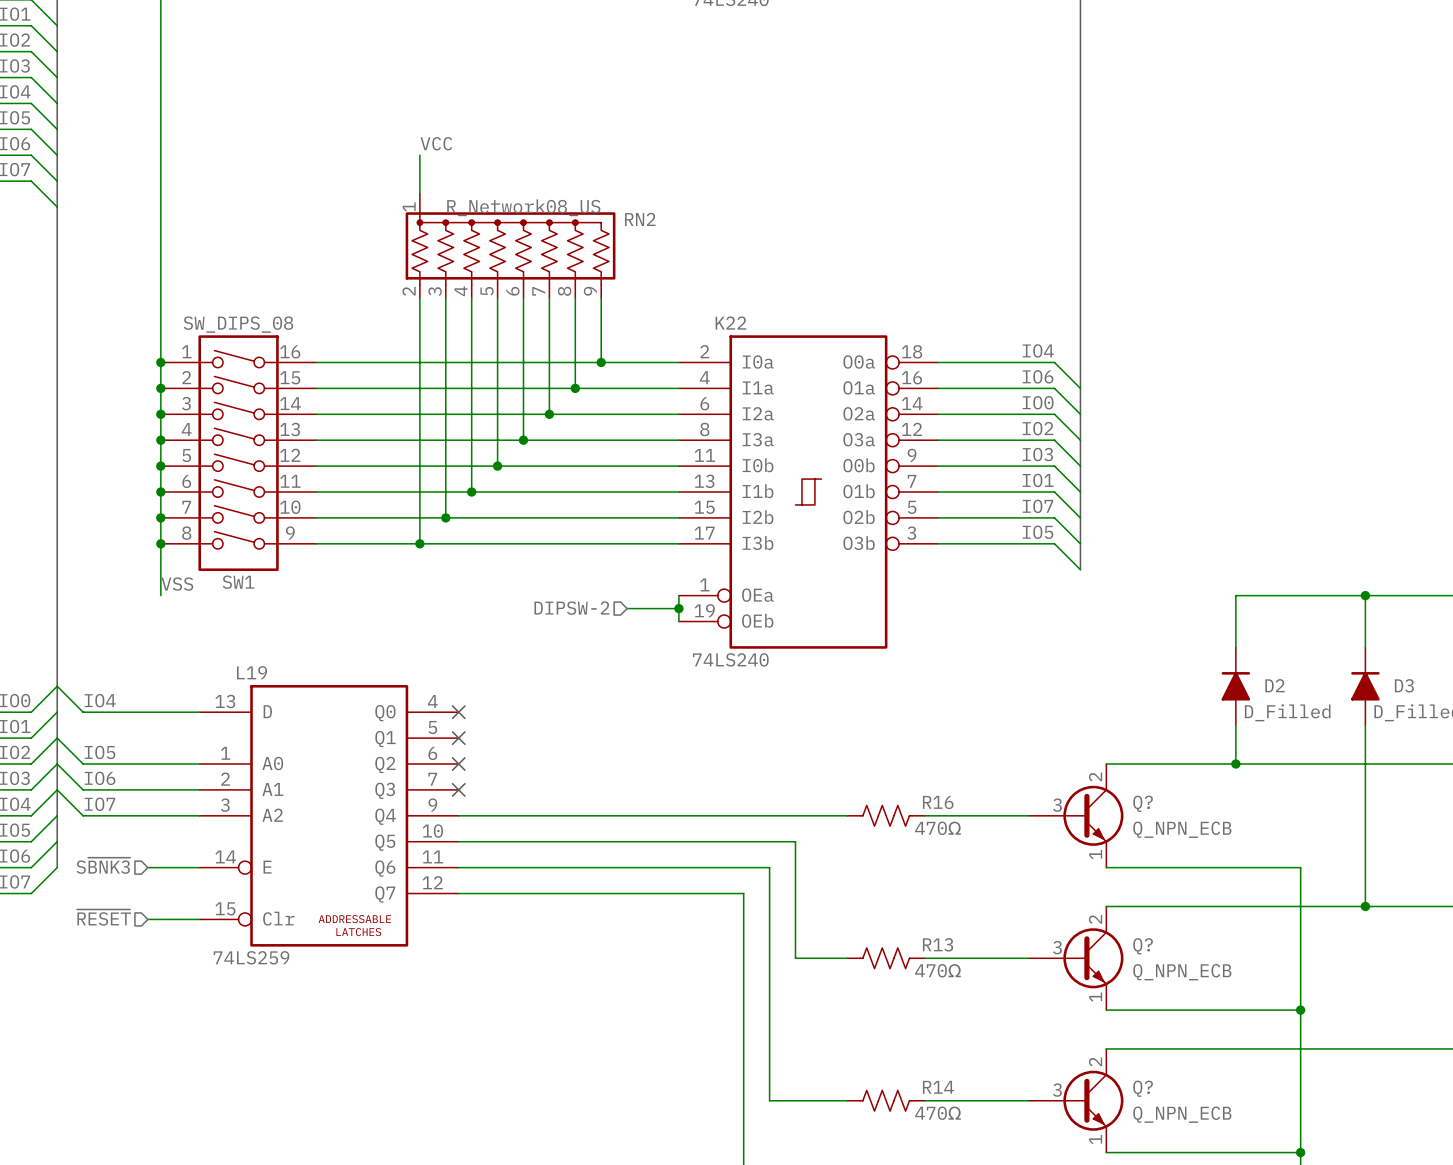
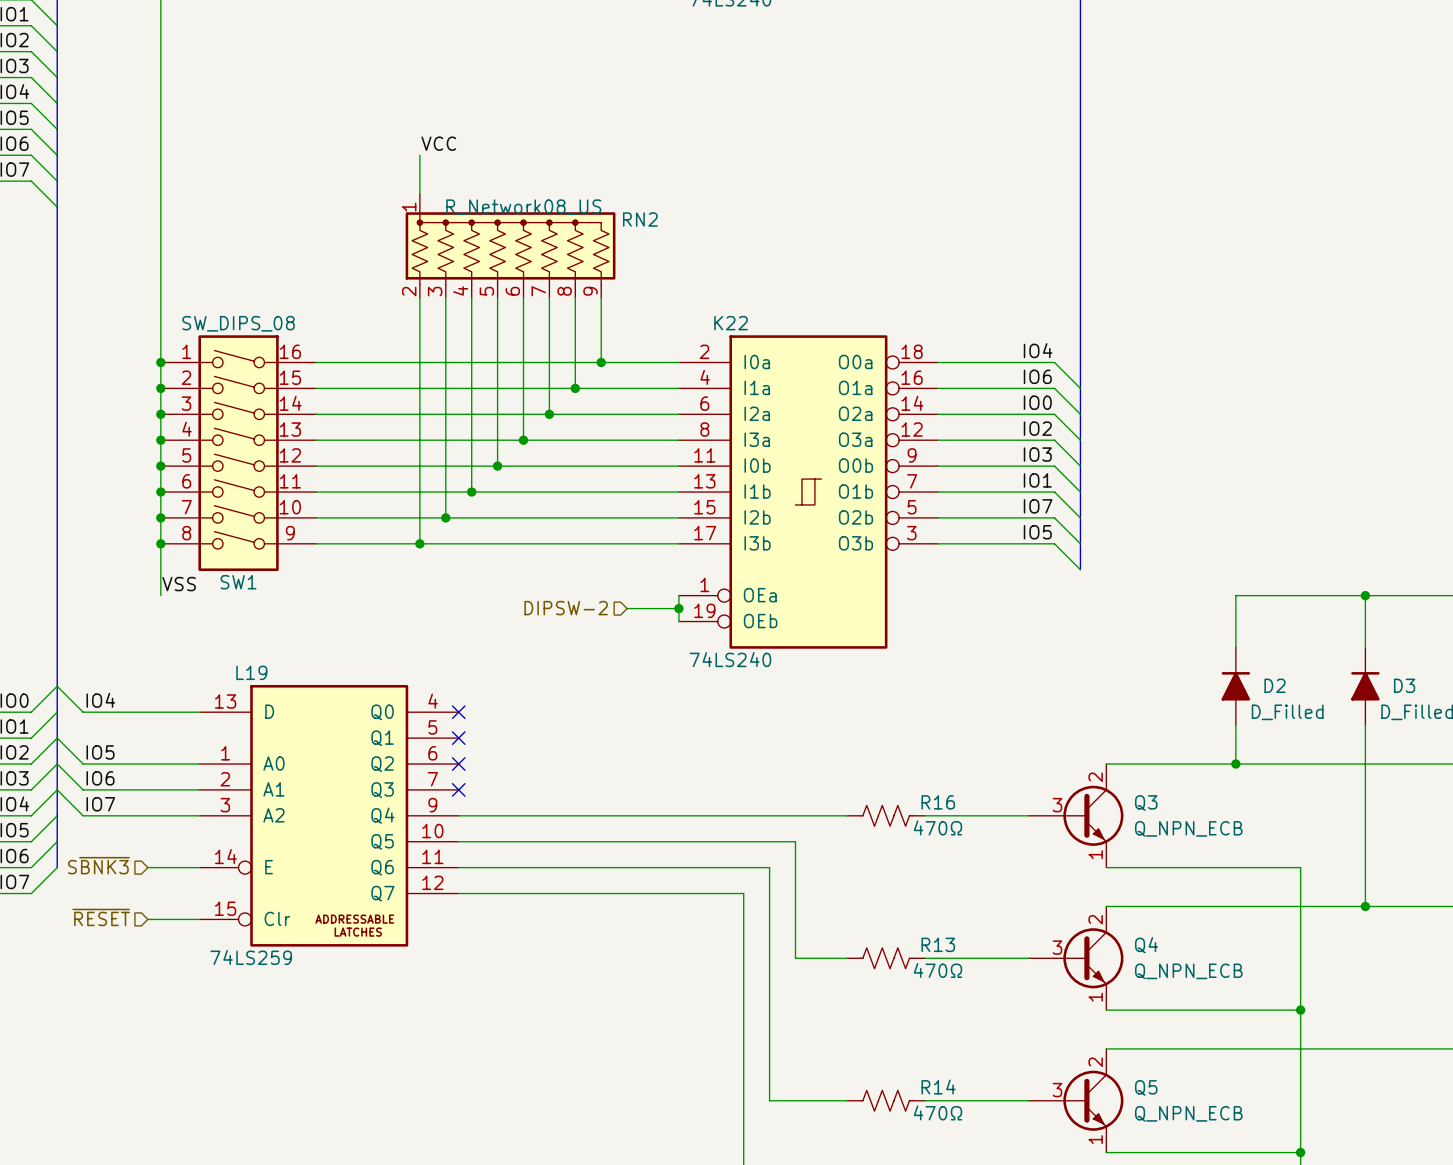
Q? name: Q? (1143, 803) -> Q3 (1146, 802)
Q? name: Q? (1143, 946) -> Q4 (1146, 945)
Q? name: Q? (1143, 1088) -> Q5 (1146, 1087)

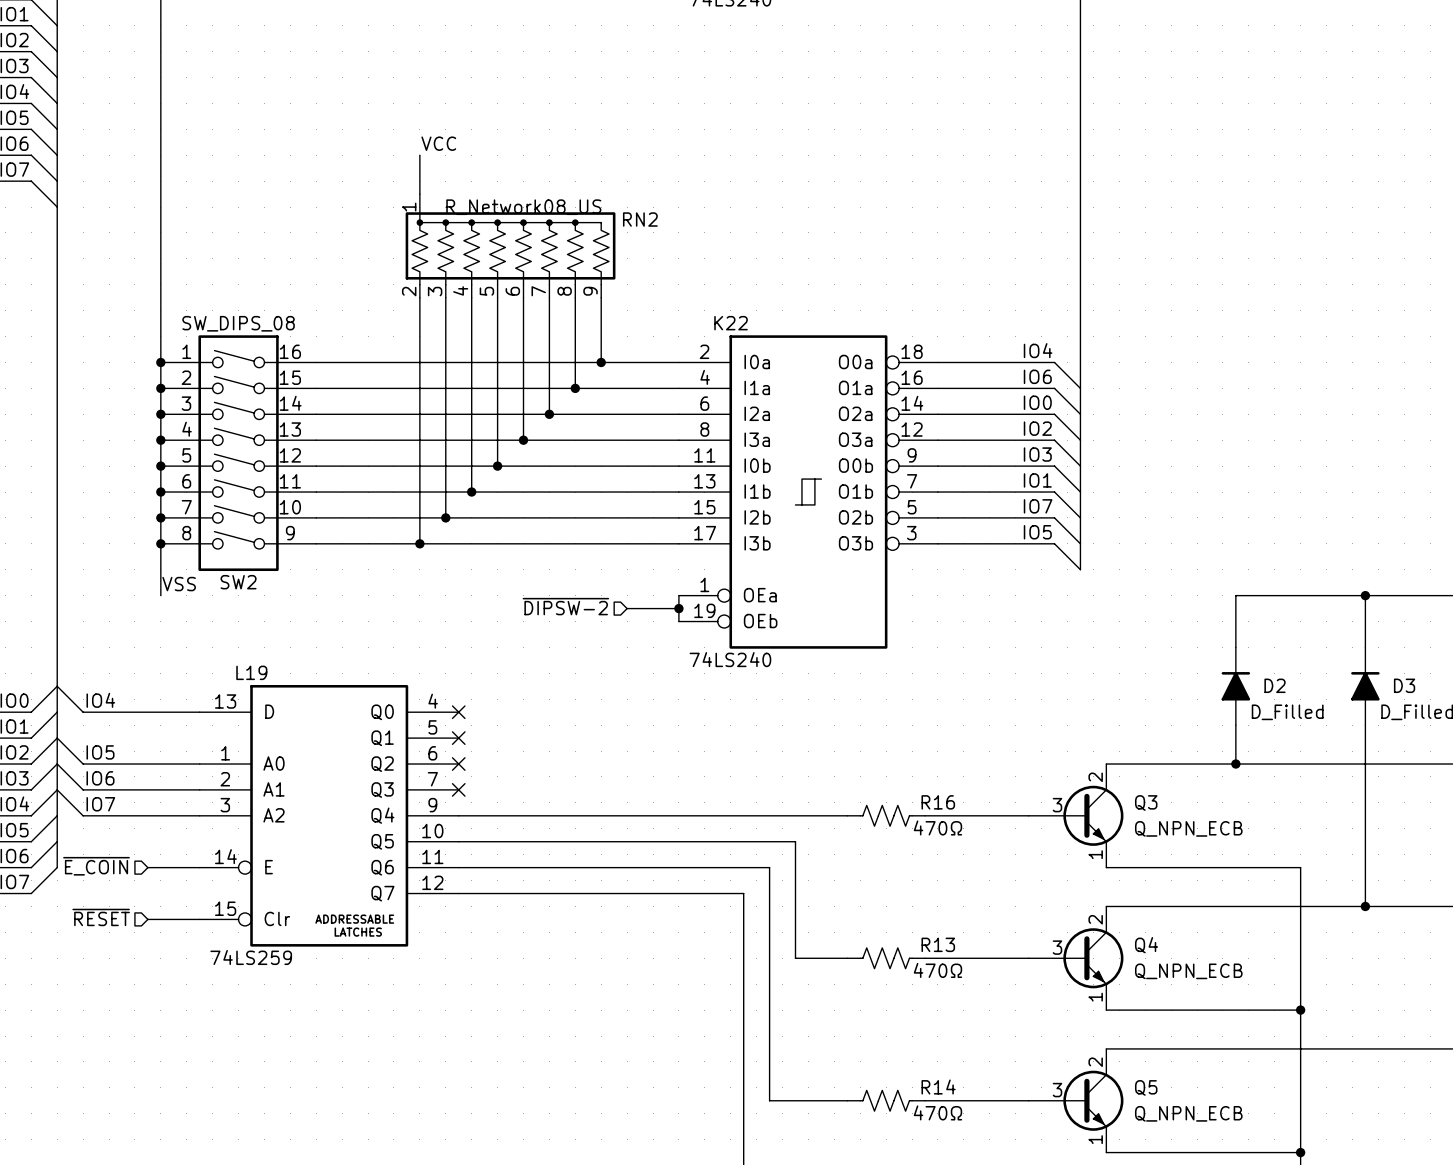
SW1 name: SW1 (238, 582) -> SW2 (238, 582)
hierarchical label: DIPSW-2 (566, 608) -> ~{DIPSW-2} (565, 606)
hierarchical label: S~{BNK3} (98, 865) -> ~{E_COIN} (96, 866)

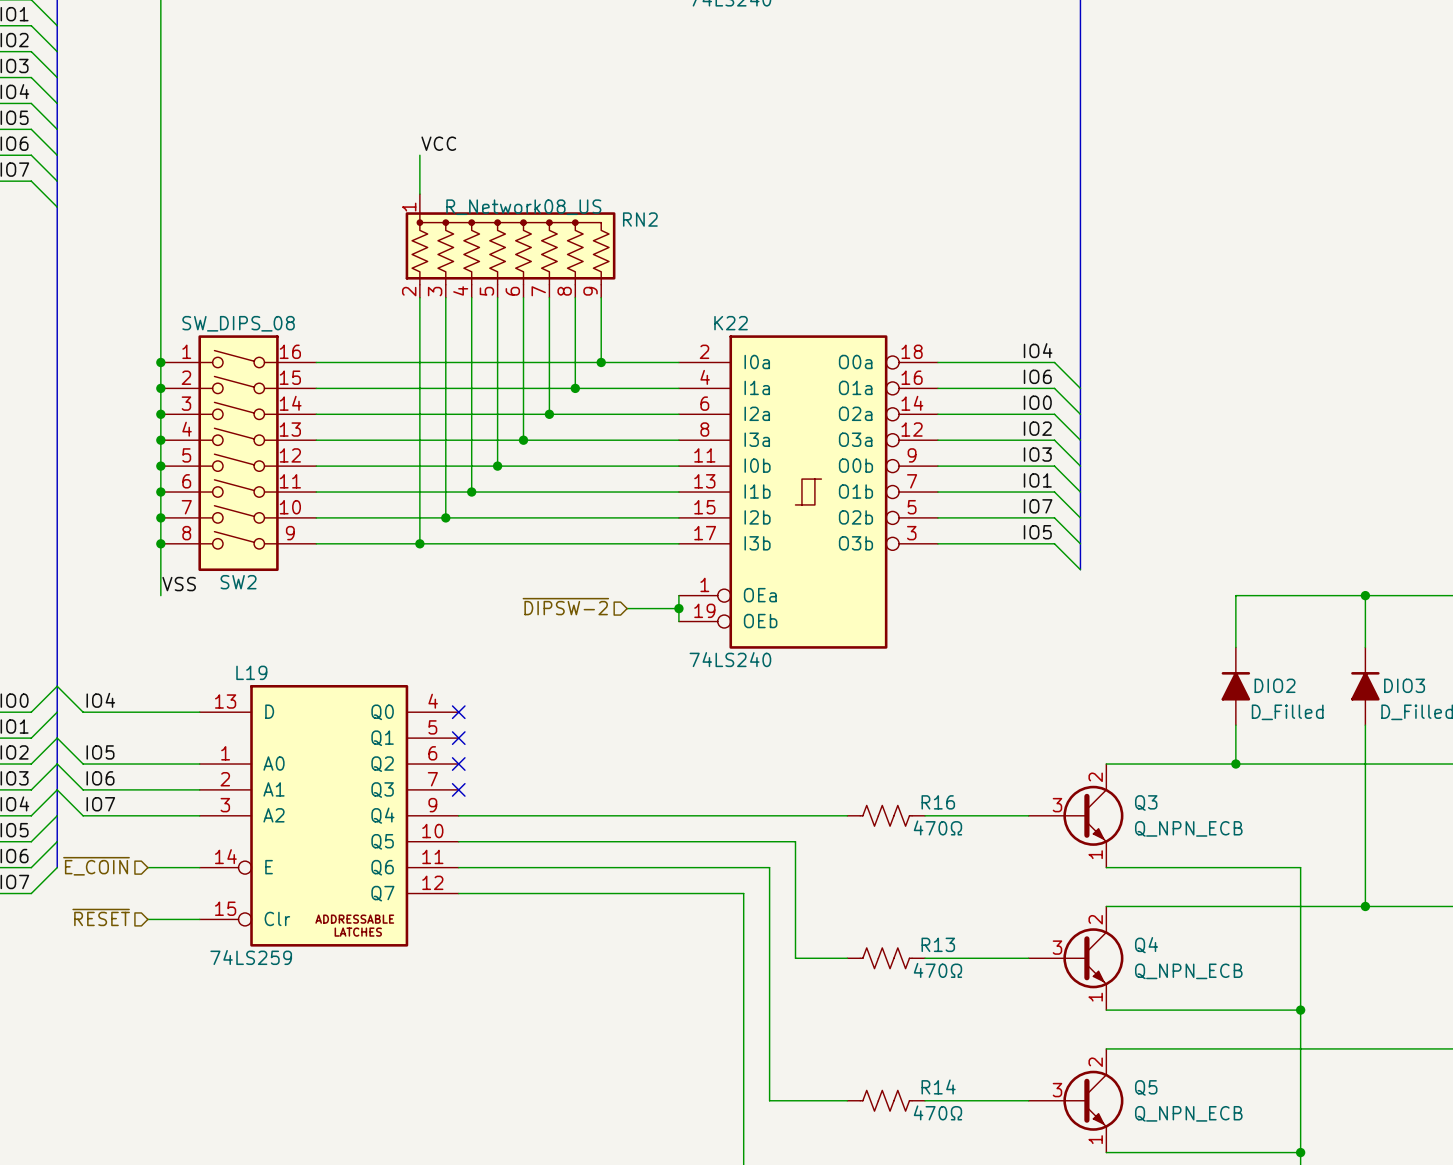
D2 name: D2 (1275, 685) -> DIO2 (1275, 685)
D3 name: D3 (1404, 685) -> DIO3 (1404, 685)

